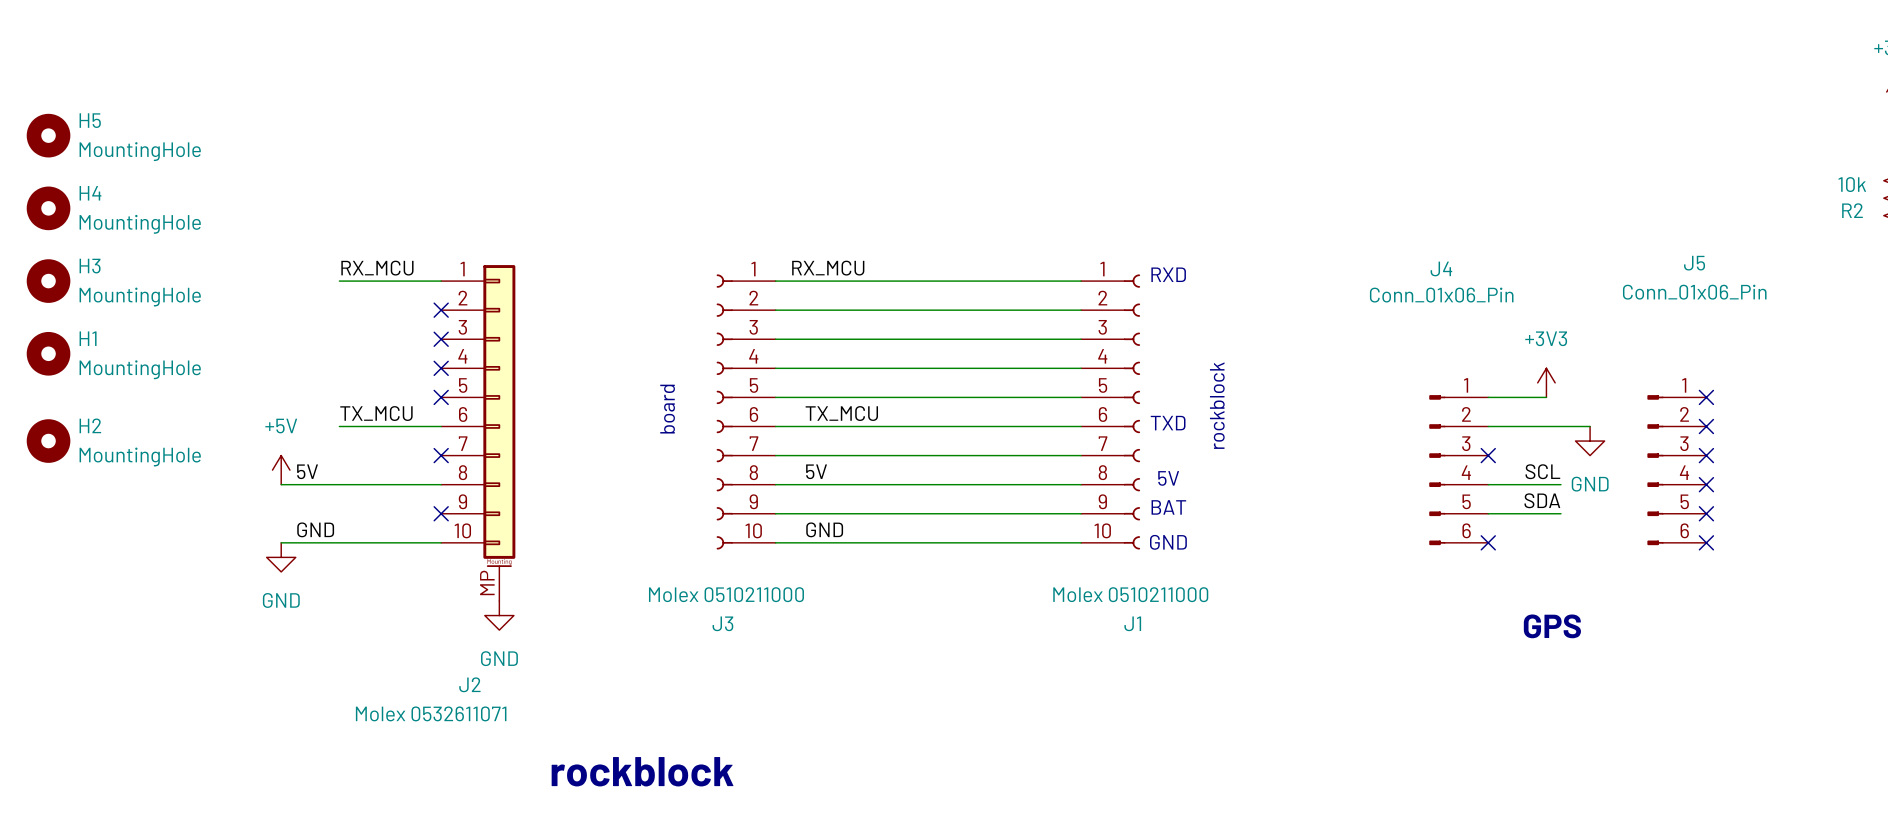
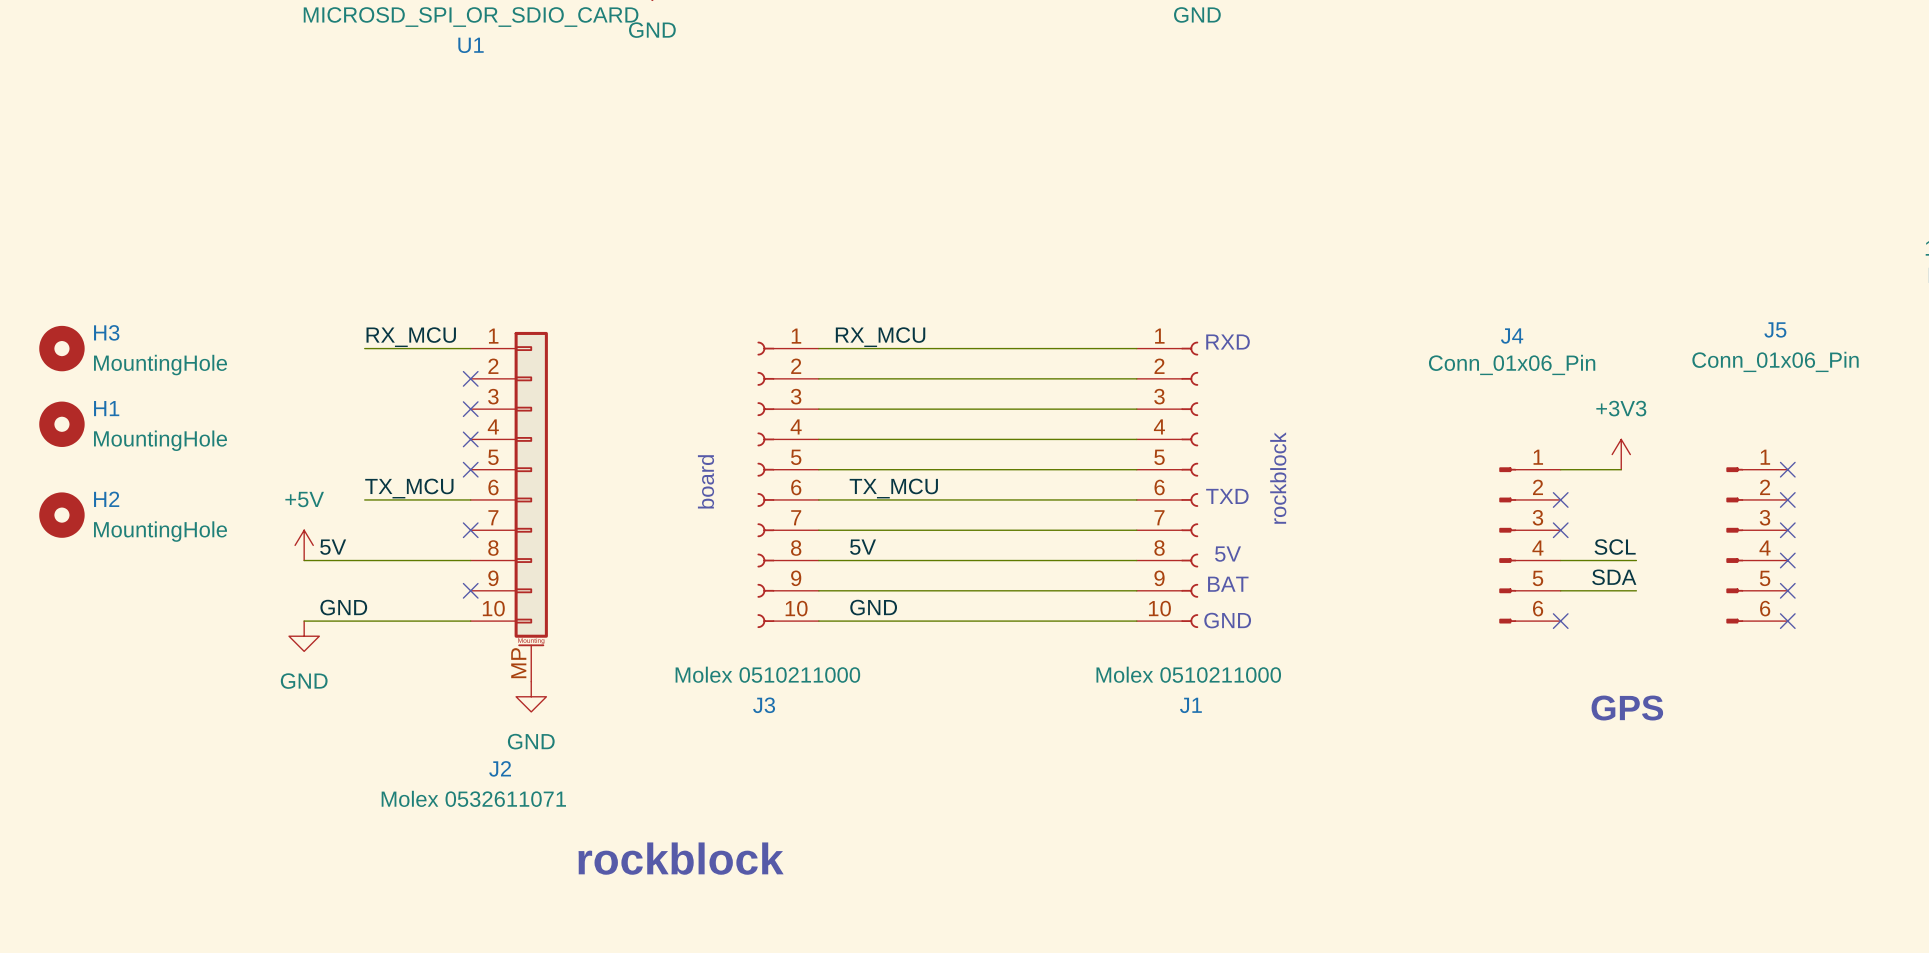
H5: MountingHole (48, 135) -> none
H4: MountingHole (48, 208) -> none
wire: (1488, 426) (1590, 426) -> none
no-connect mark: none -> (1560, 499)
power symbol: GND (1590, 441) -> none

